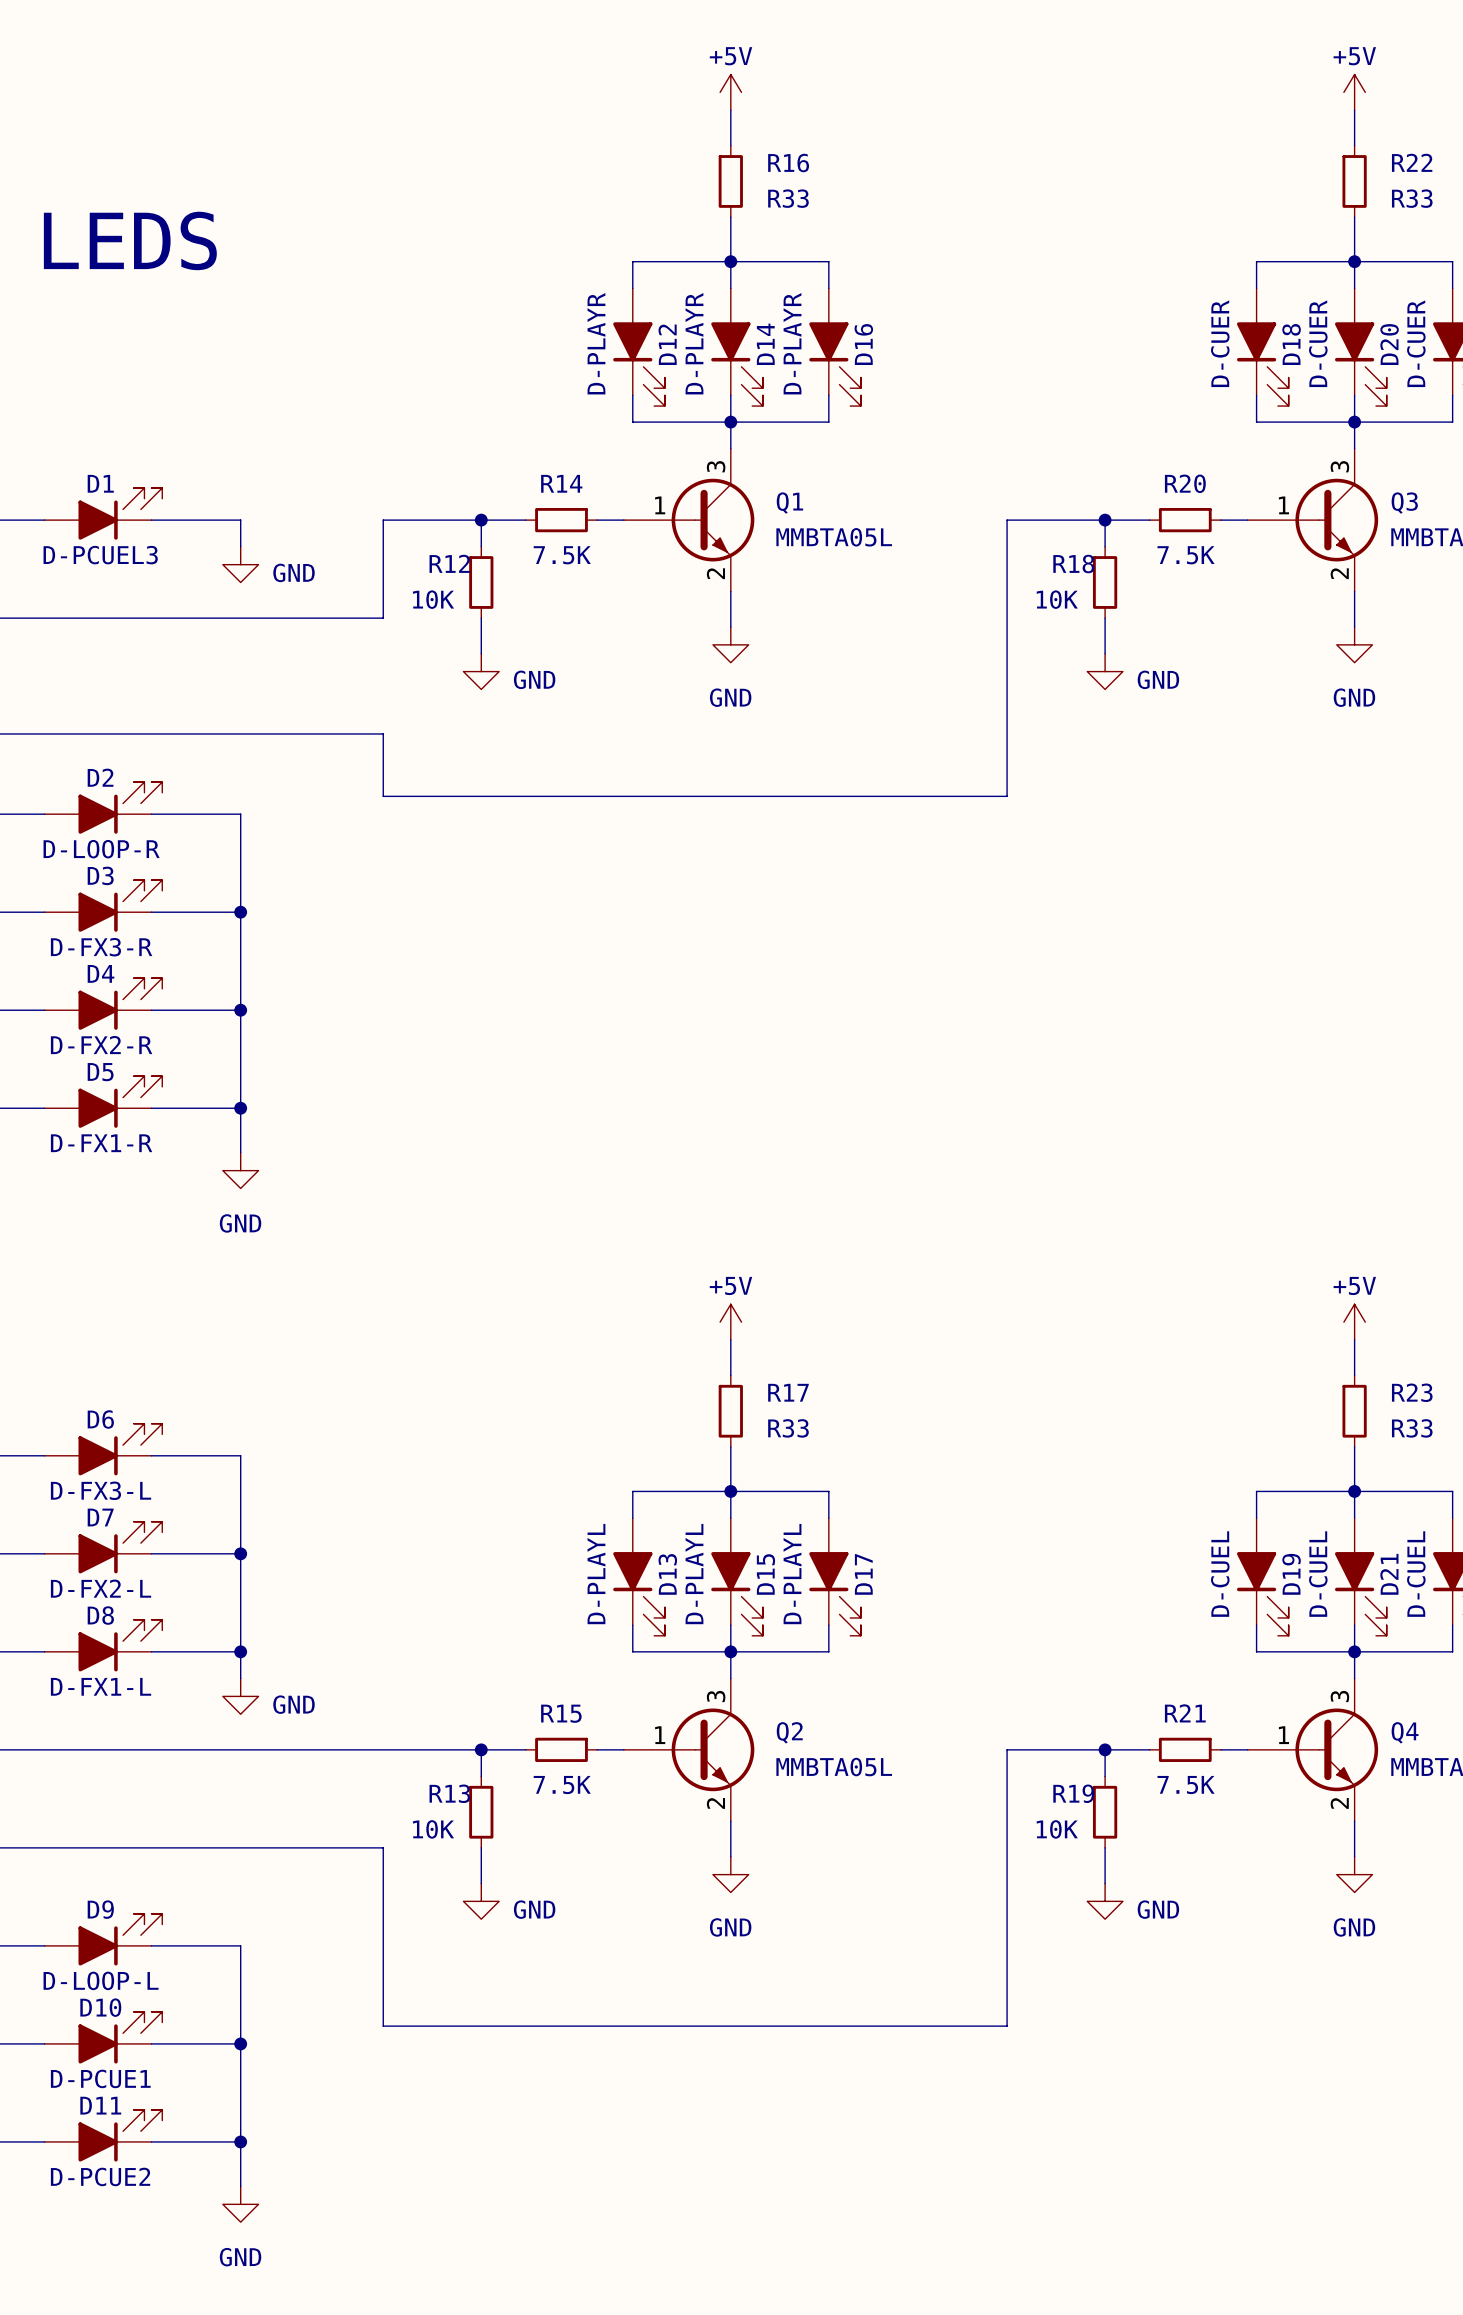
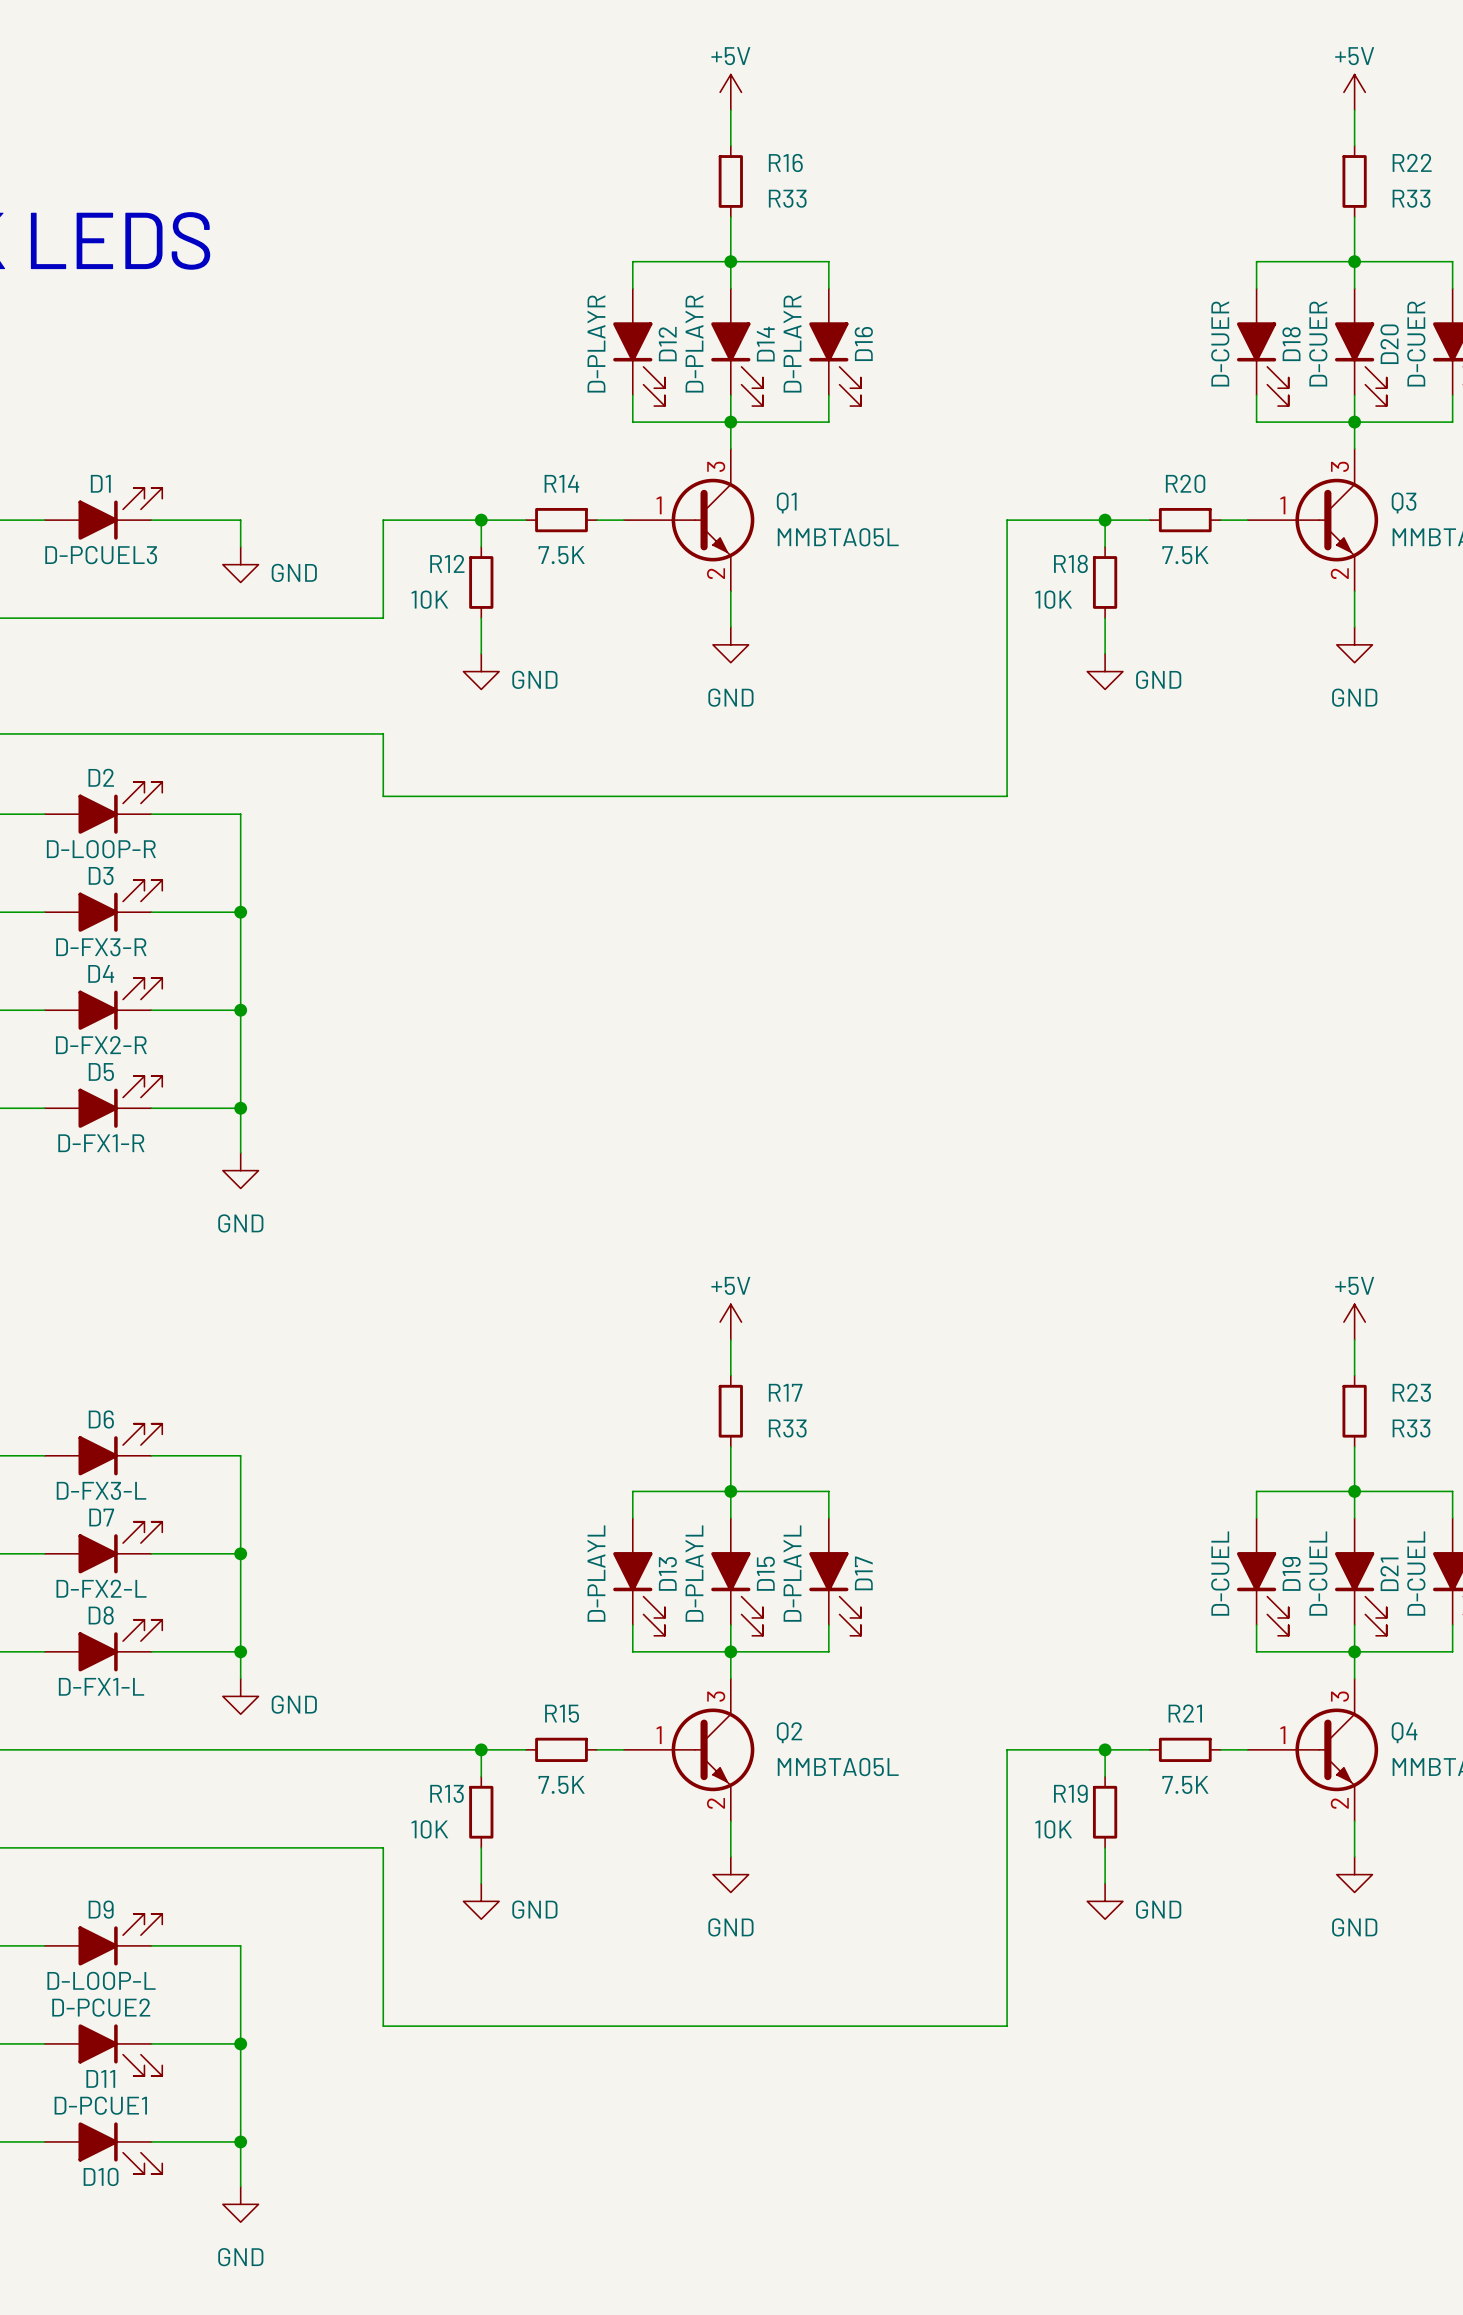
D10 position: (103, 2037) -> (103, 2148)
D10 flip: as is (120, 2037) -> up-down (120, 2148)
D11 position: (103, 2135) -> (103, 2050)
D11 flip: as is (120, 2135) -> up-down (120, 2050)

